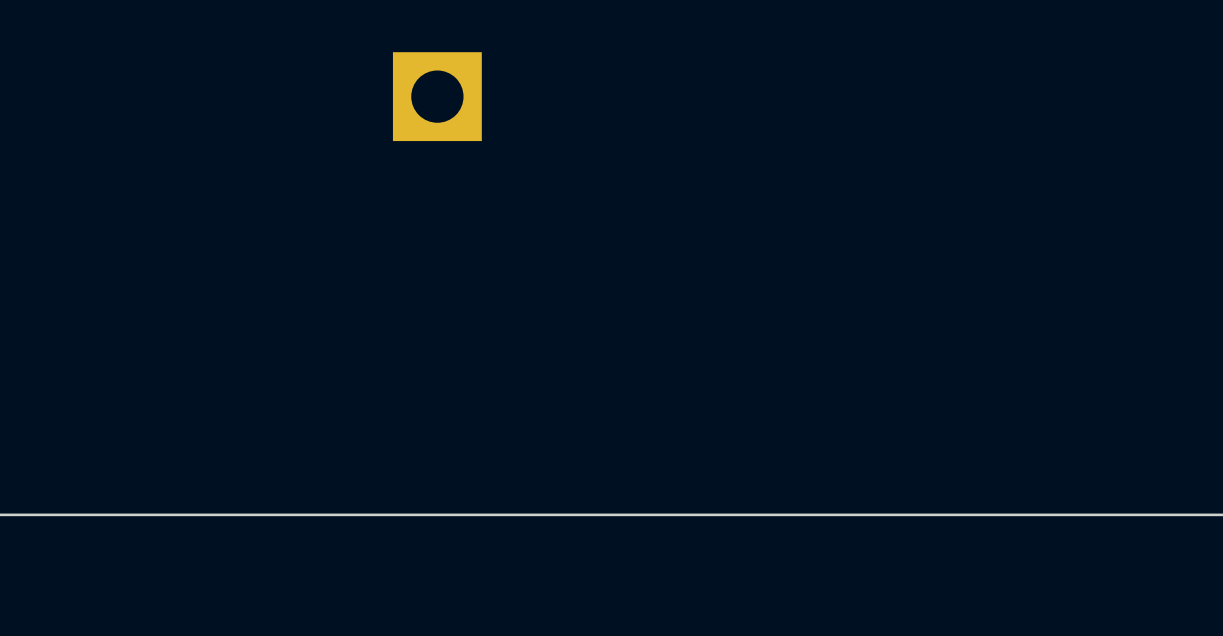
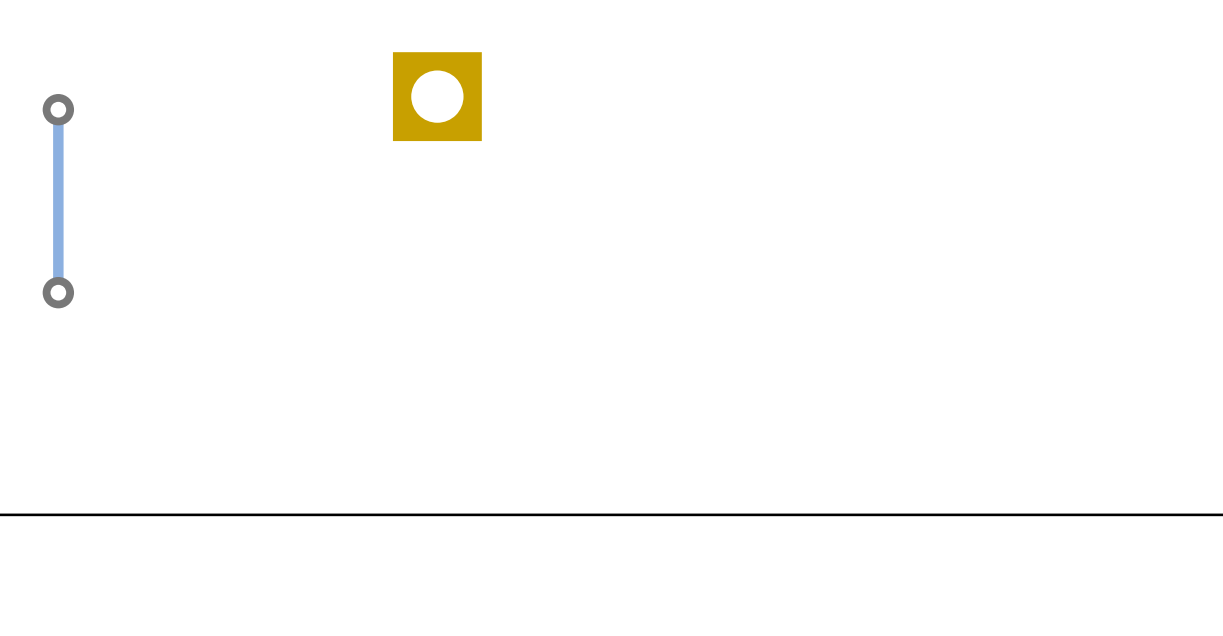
track: none -> (58, 109) (58, 292)
via: none -> (58, 109)
via: none -> (58, 292)

